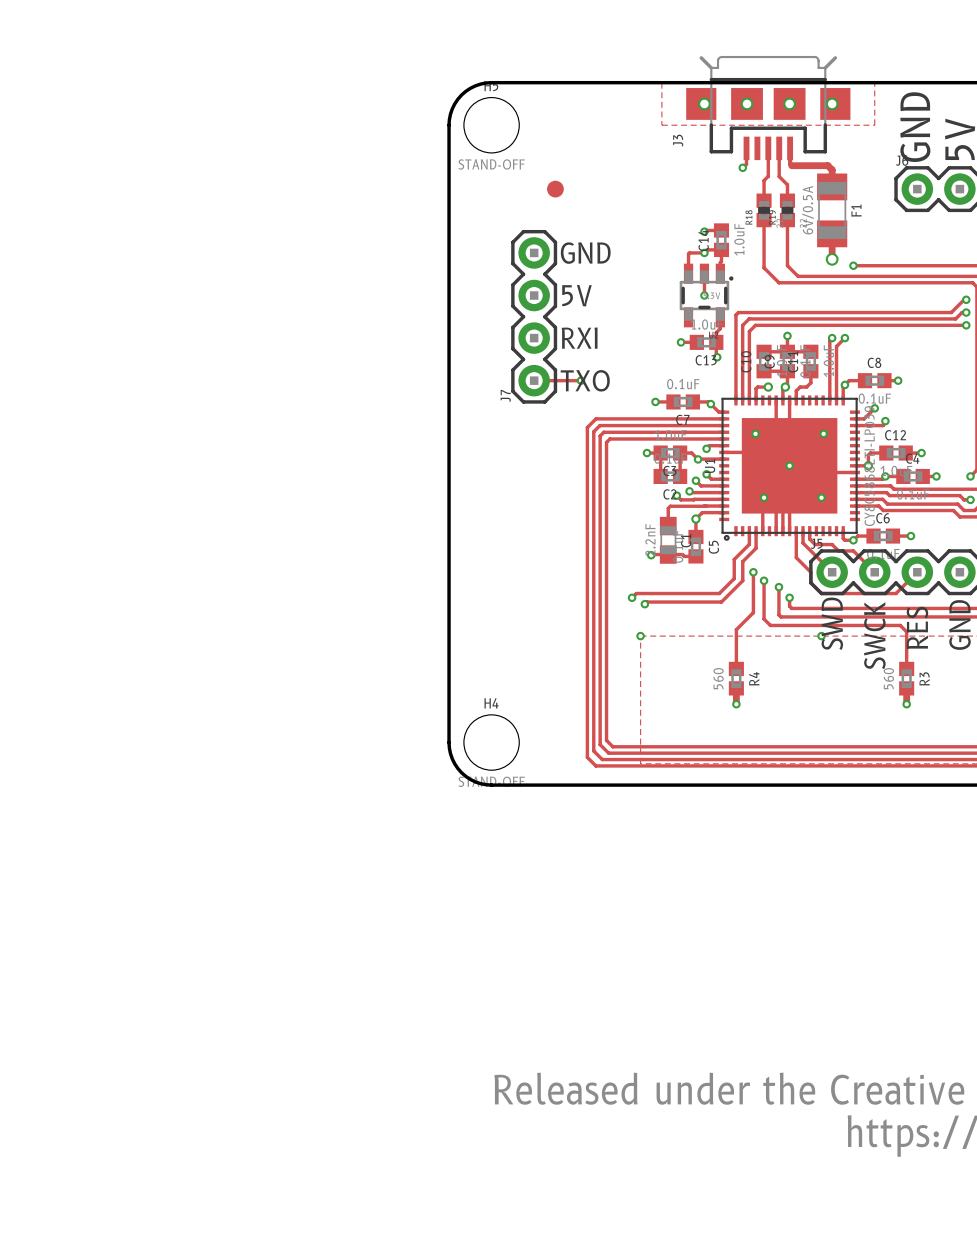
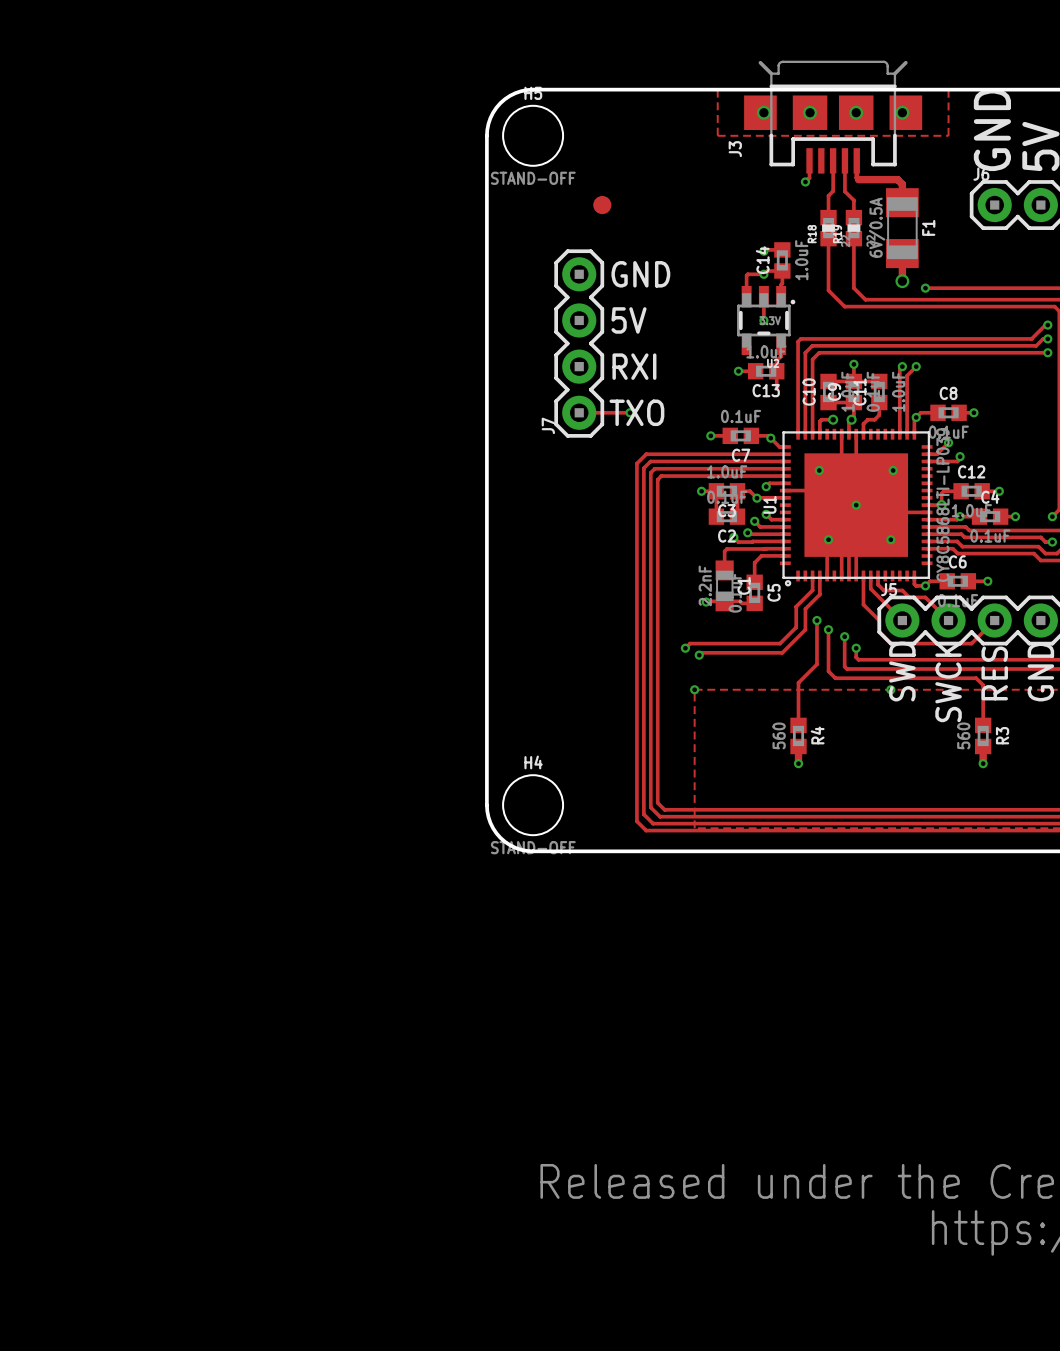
via: (717, 357) -> none
via: (695, 519) -> none

